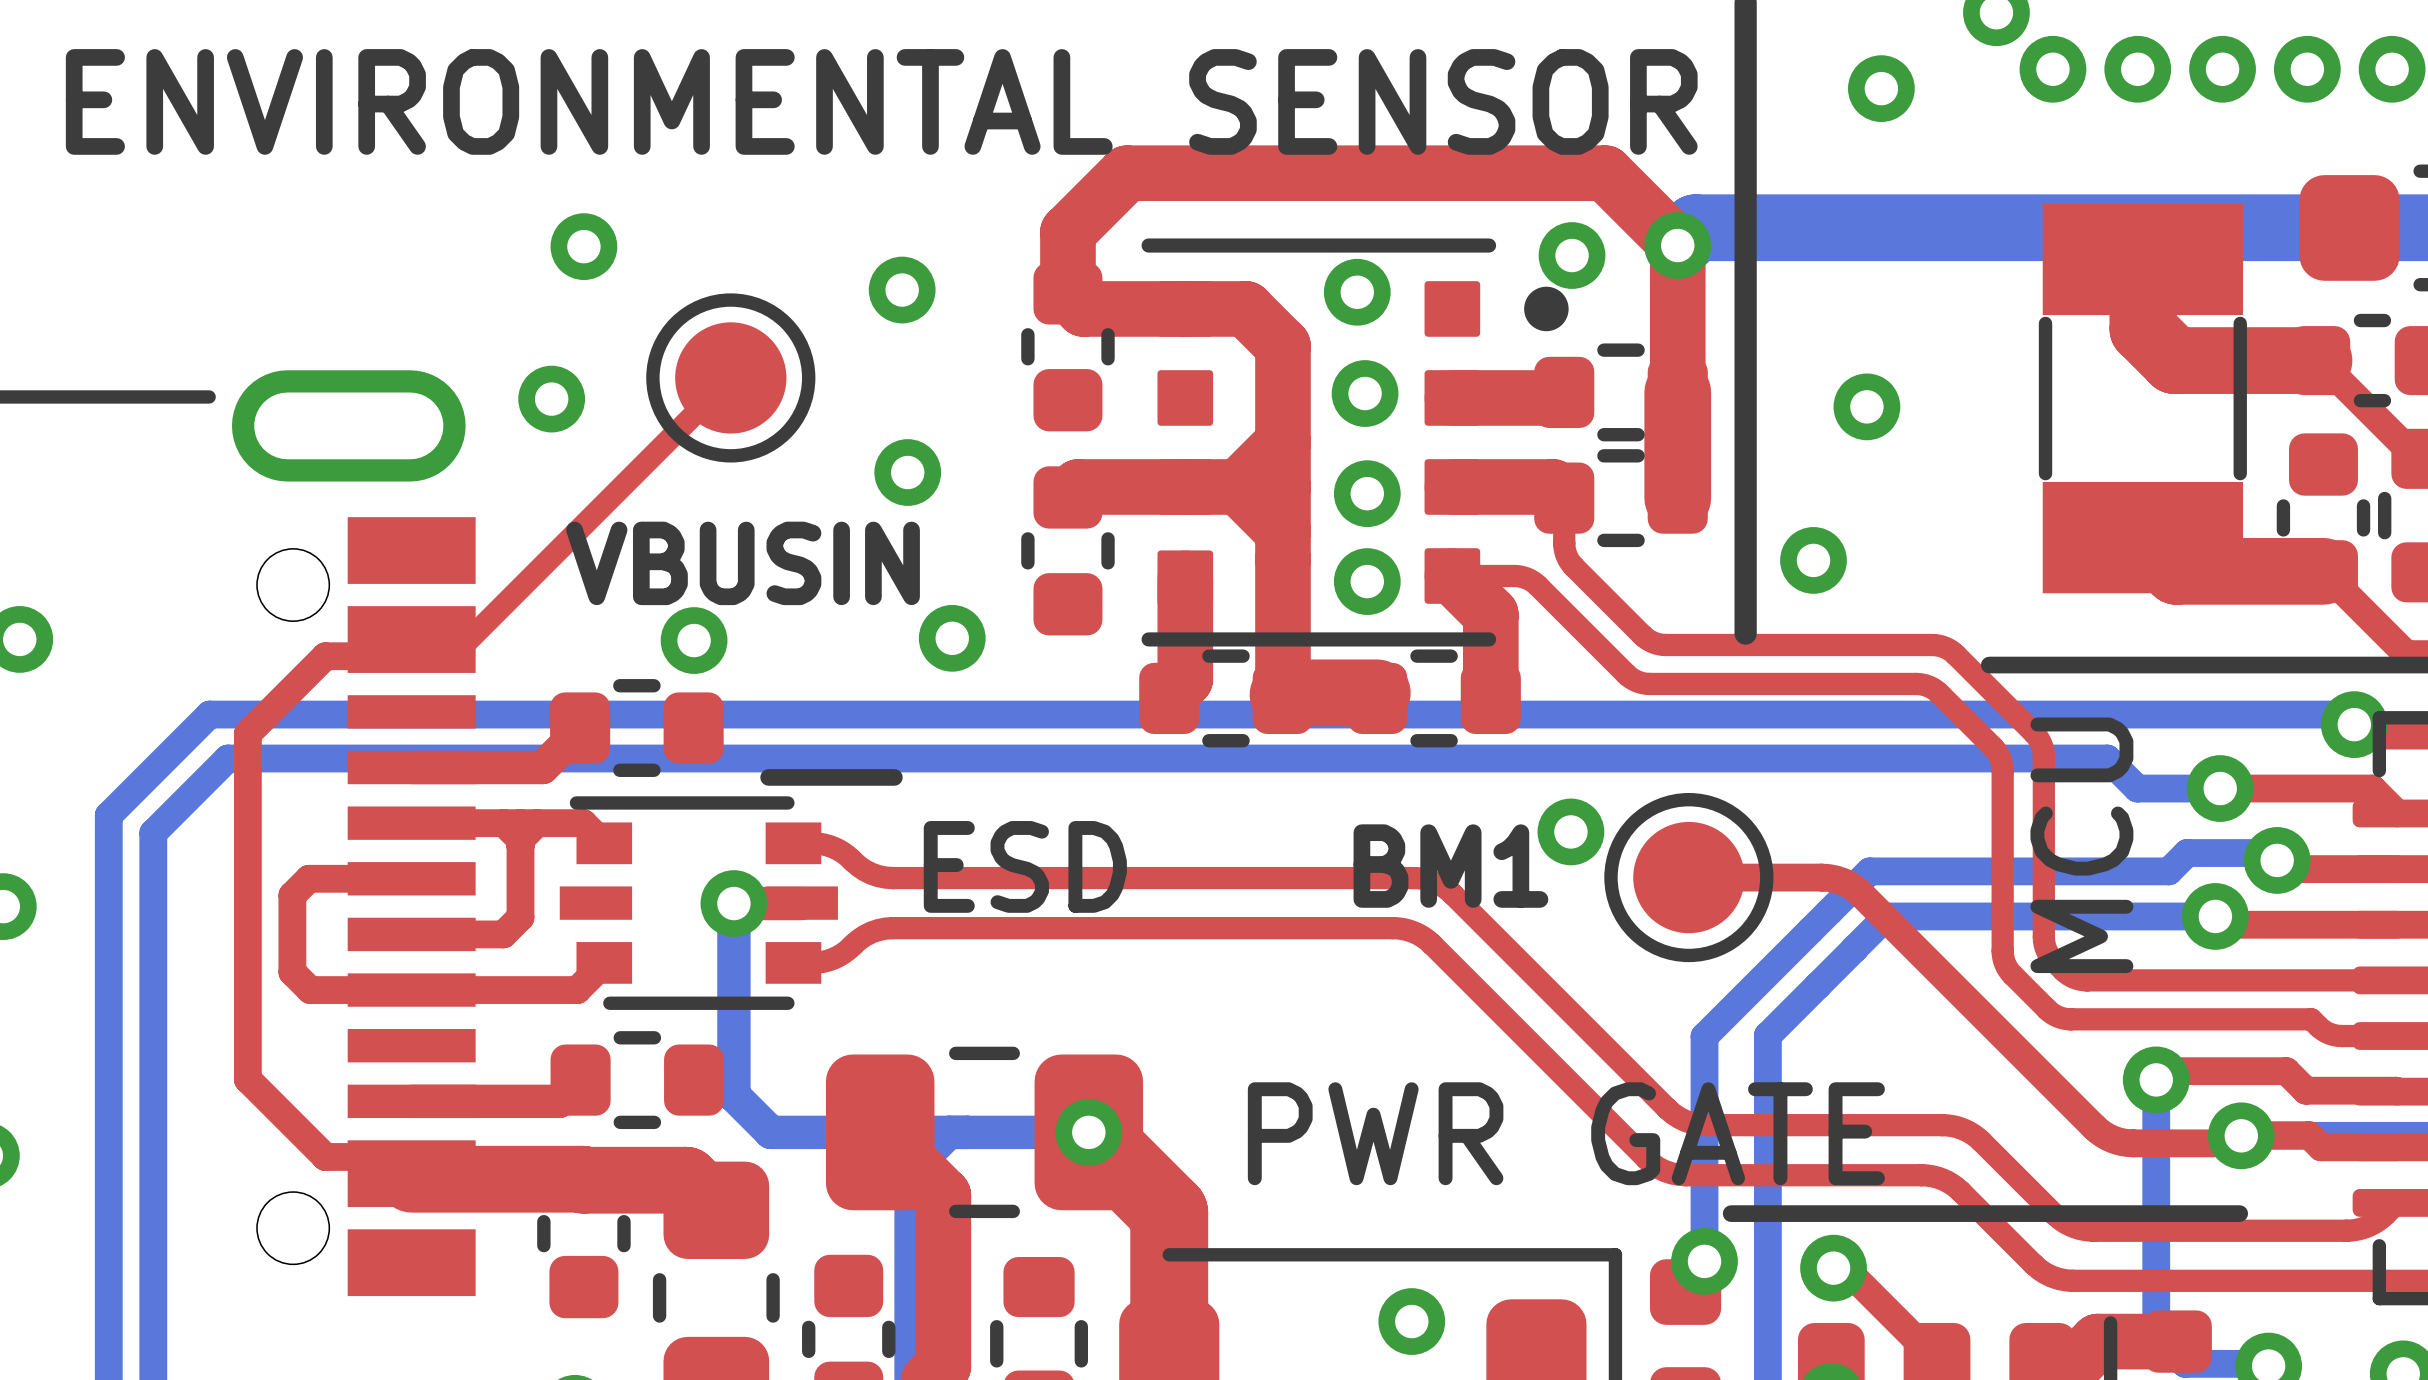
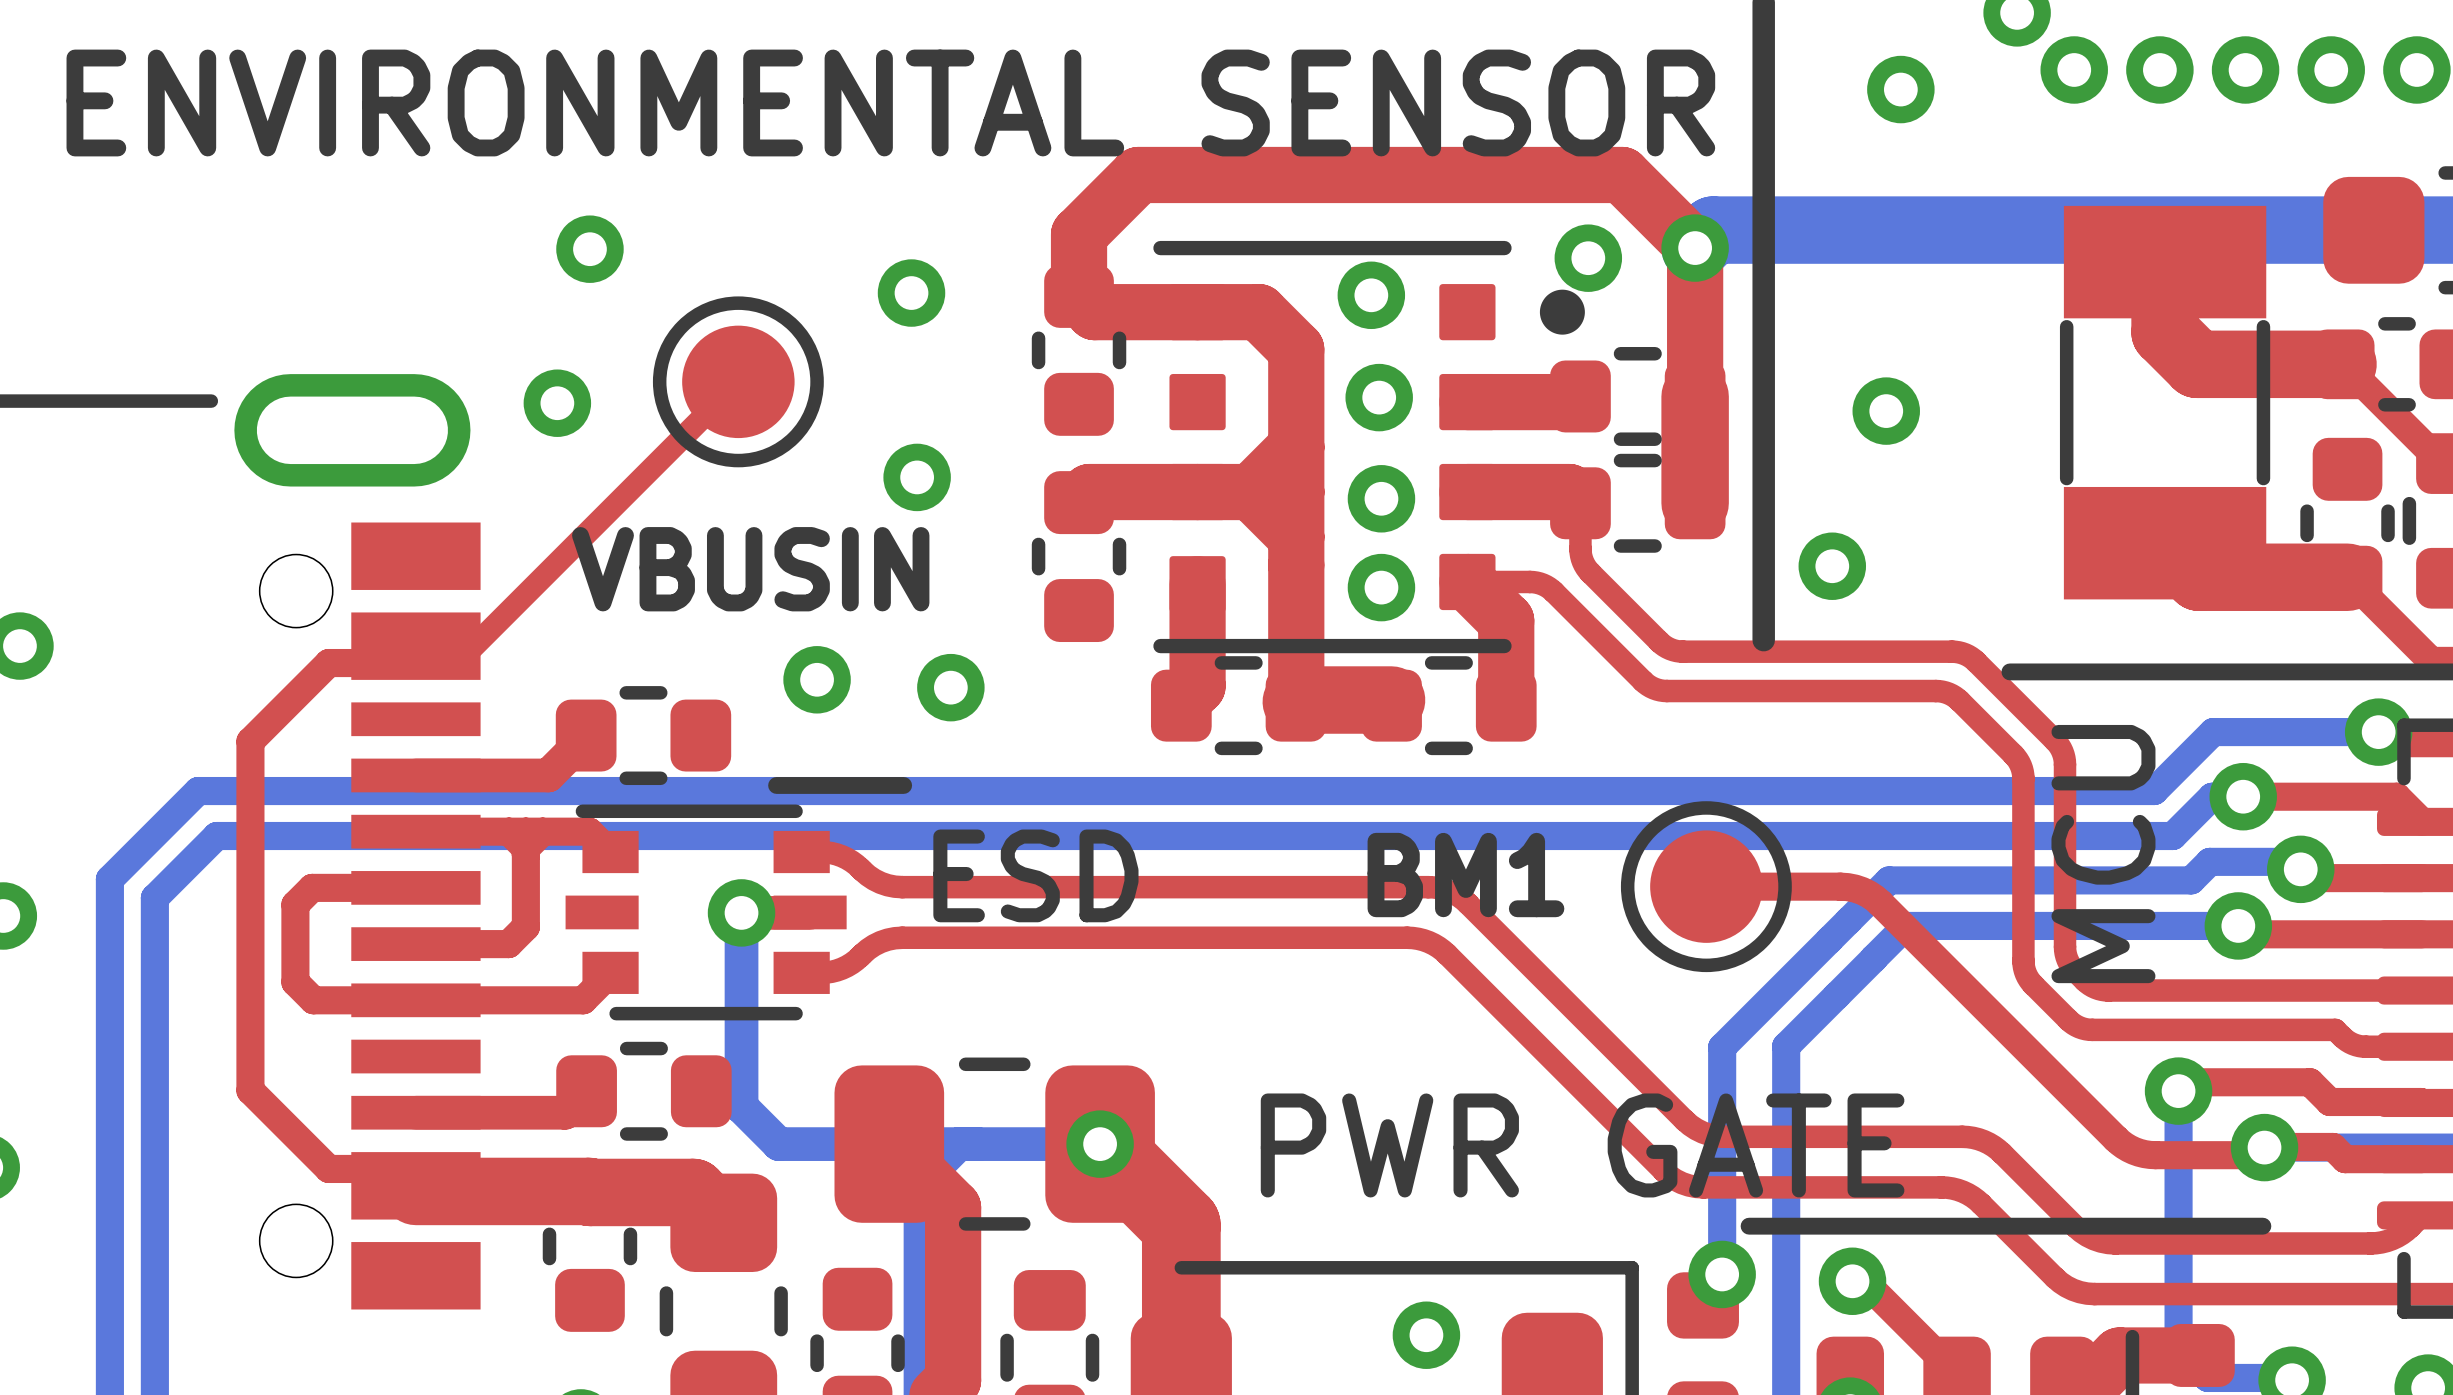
via position: (952, 638) -> (950, 687)
via: (694, 640) -> none
via: none -> (817, 679)
bottom track: (2354, 724) (2344, 714) (209, 714) (108, 815) (108, 870) -> (2378, 732) (2213, 732) (2154, 791) (198, 791) (109, 879)
bottom track: (2189, 788) (2137, 788) (2107, 758) (227, 758) (153, 833) (153, 888) -> (2212, 796) (2172, 836) (216, 836) (154, 897)
via: (1570, 831) -> none

